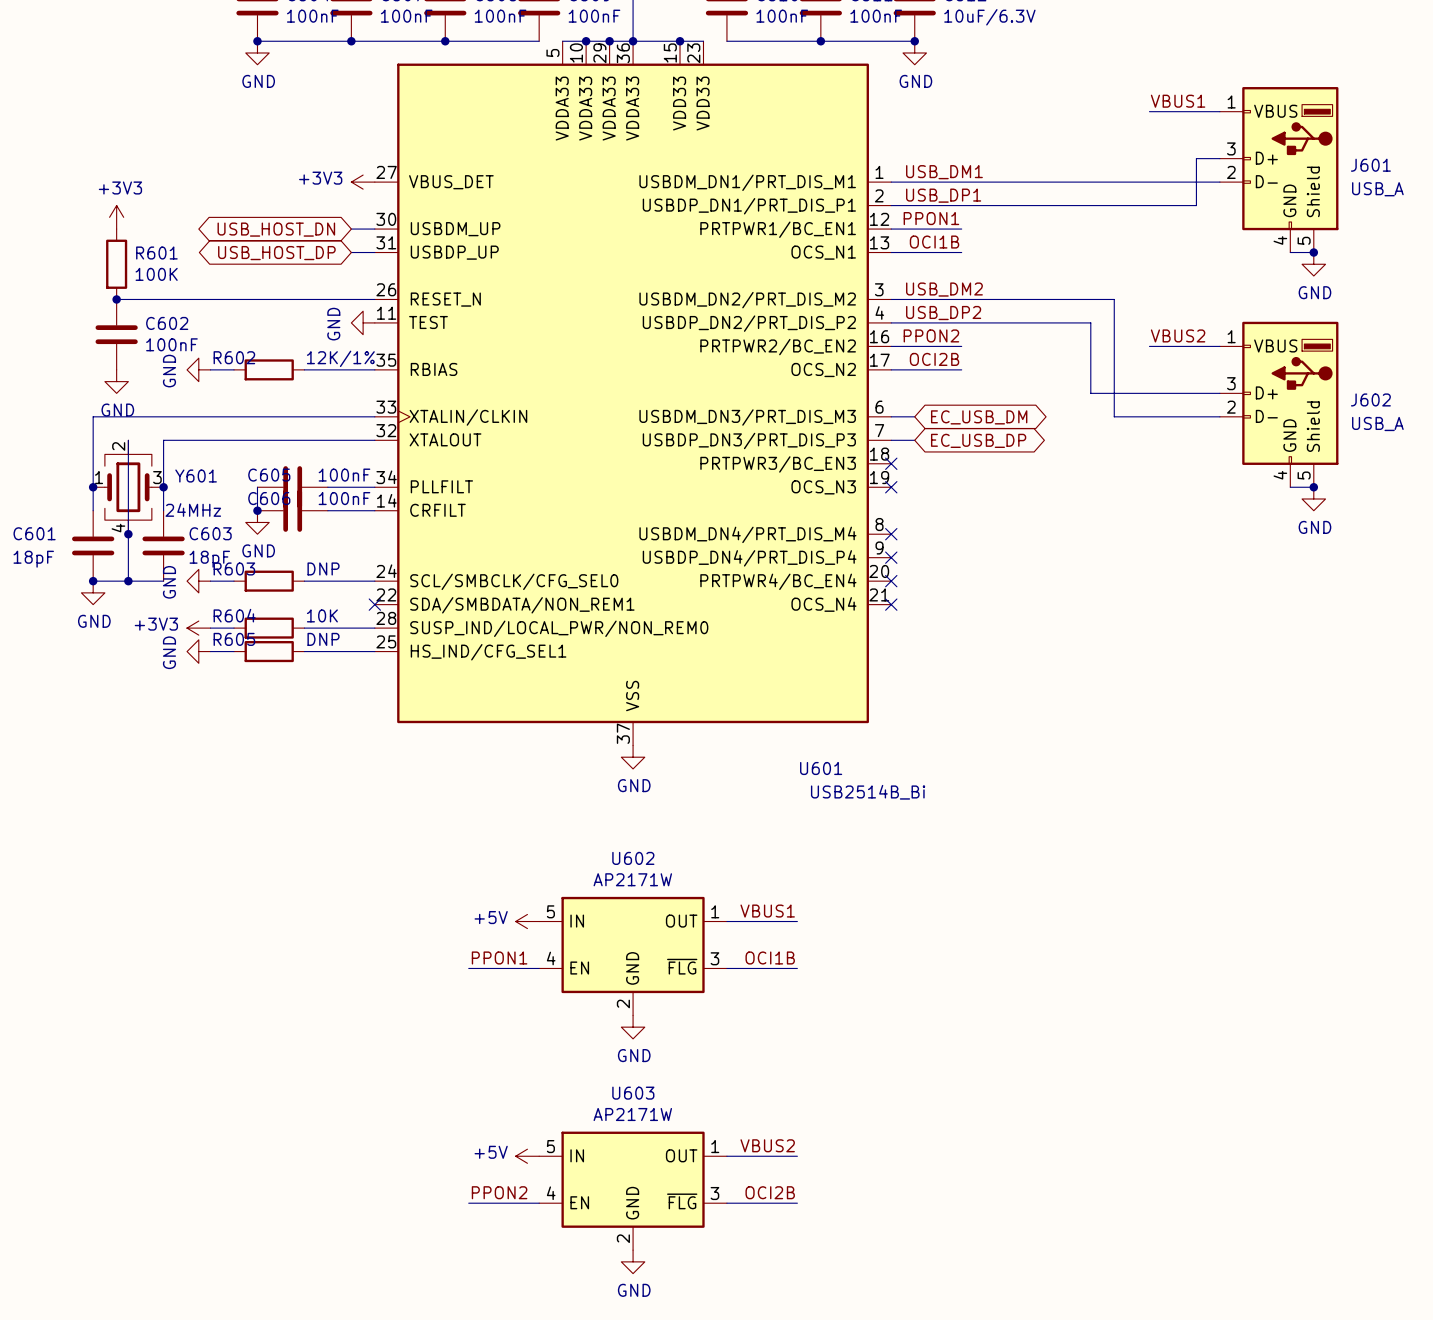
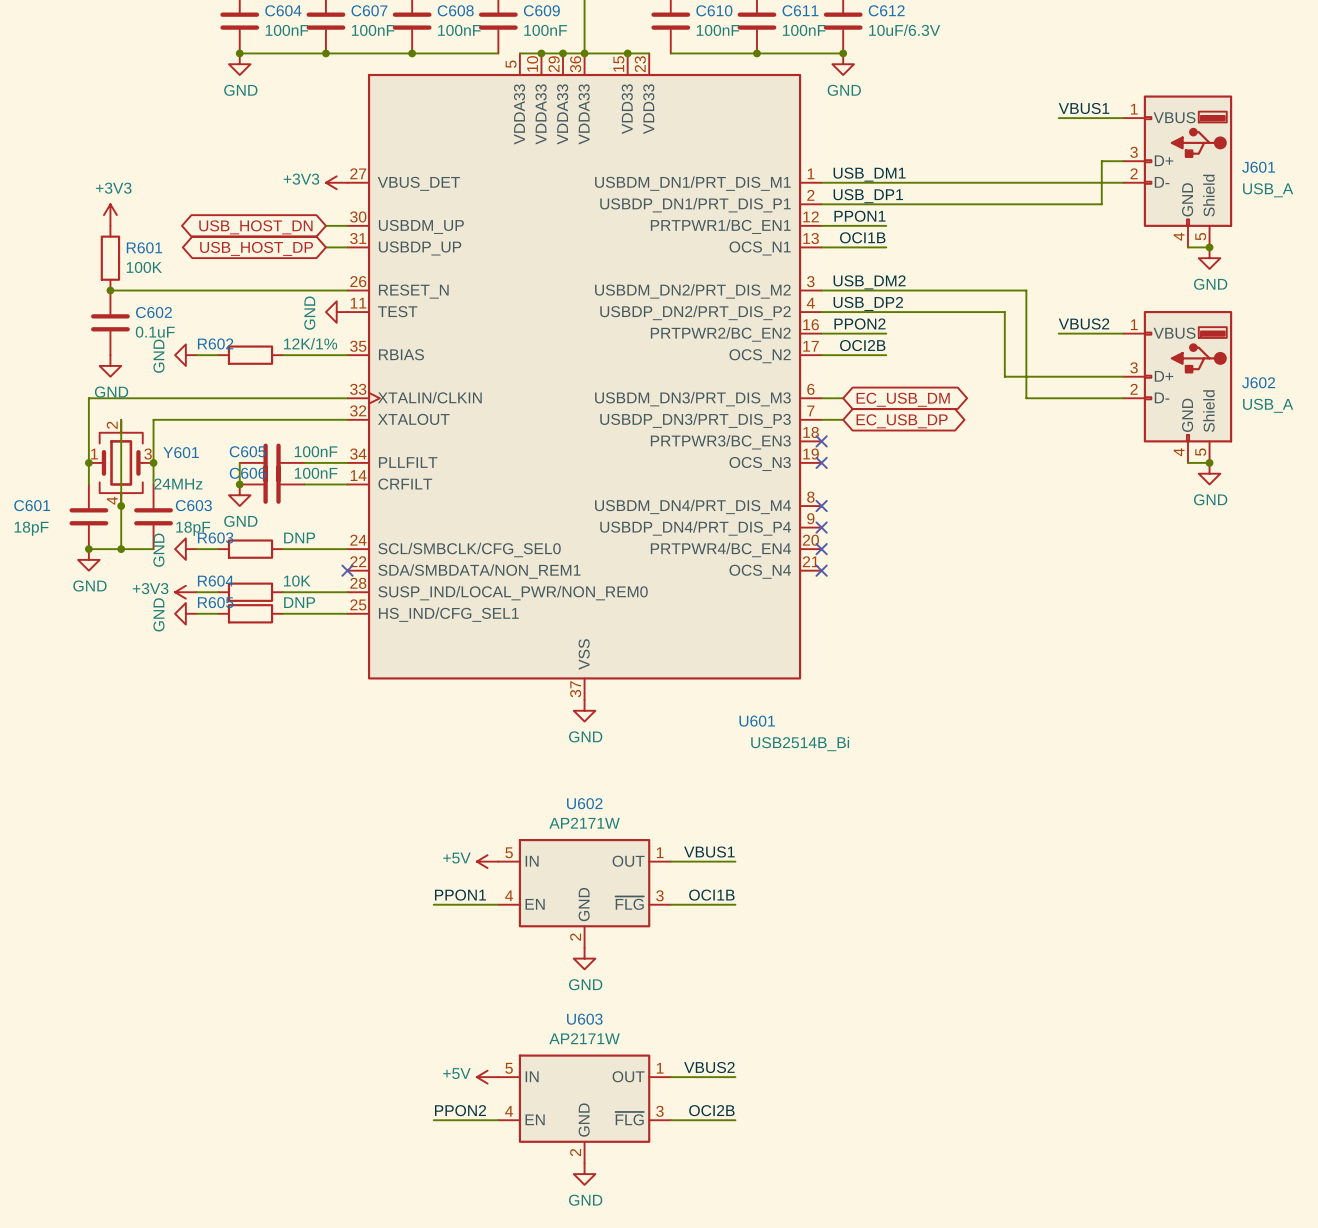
C602 value: 100nF (171, 344) -> 0.1uF (155, 332)

